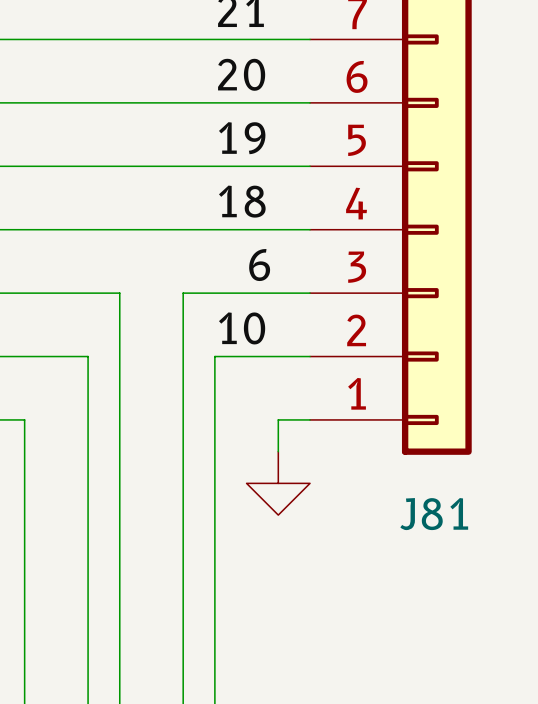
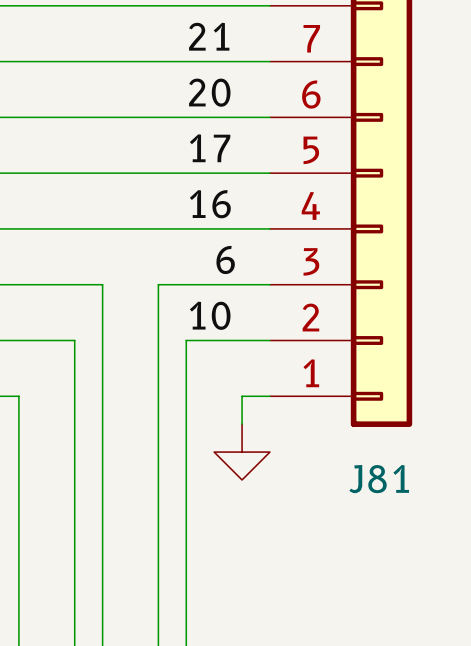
label: 19 (242, 138) -> 17 (210, 148)
label: 18 (242, 201) -> 16 (210, 204)

